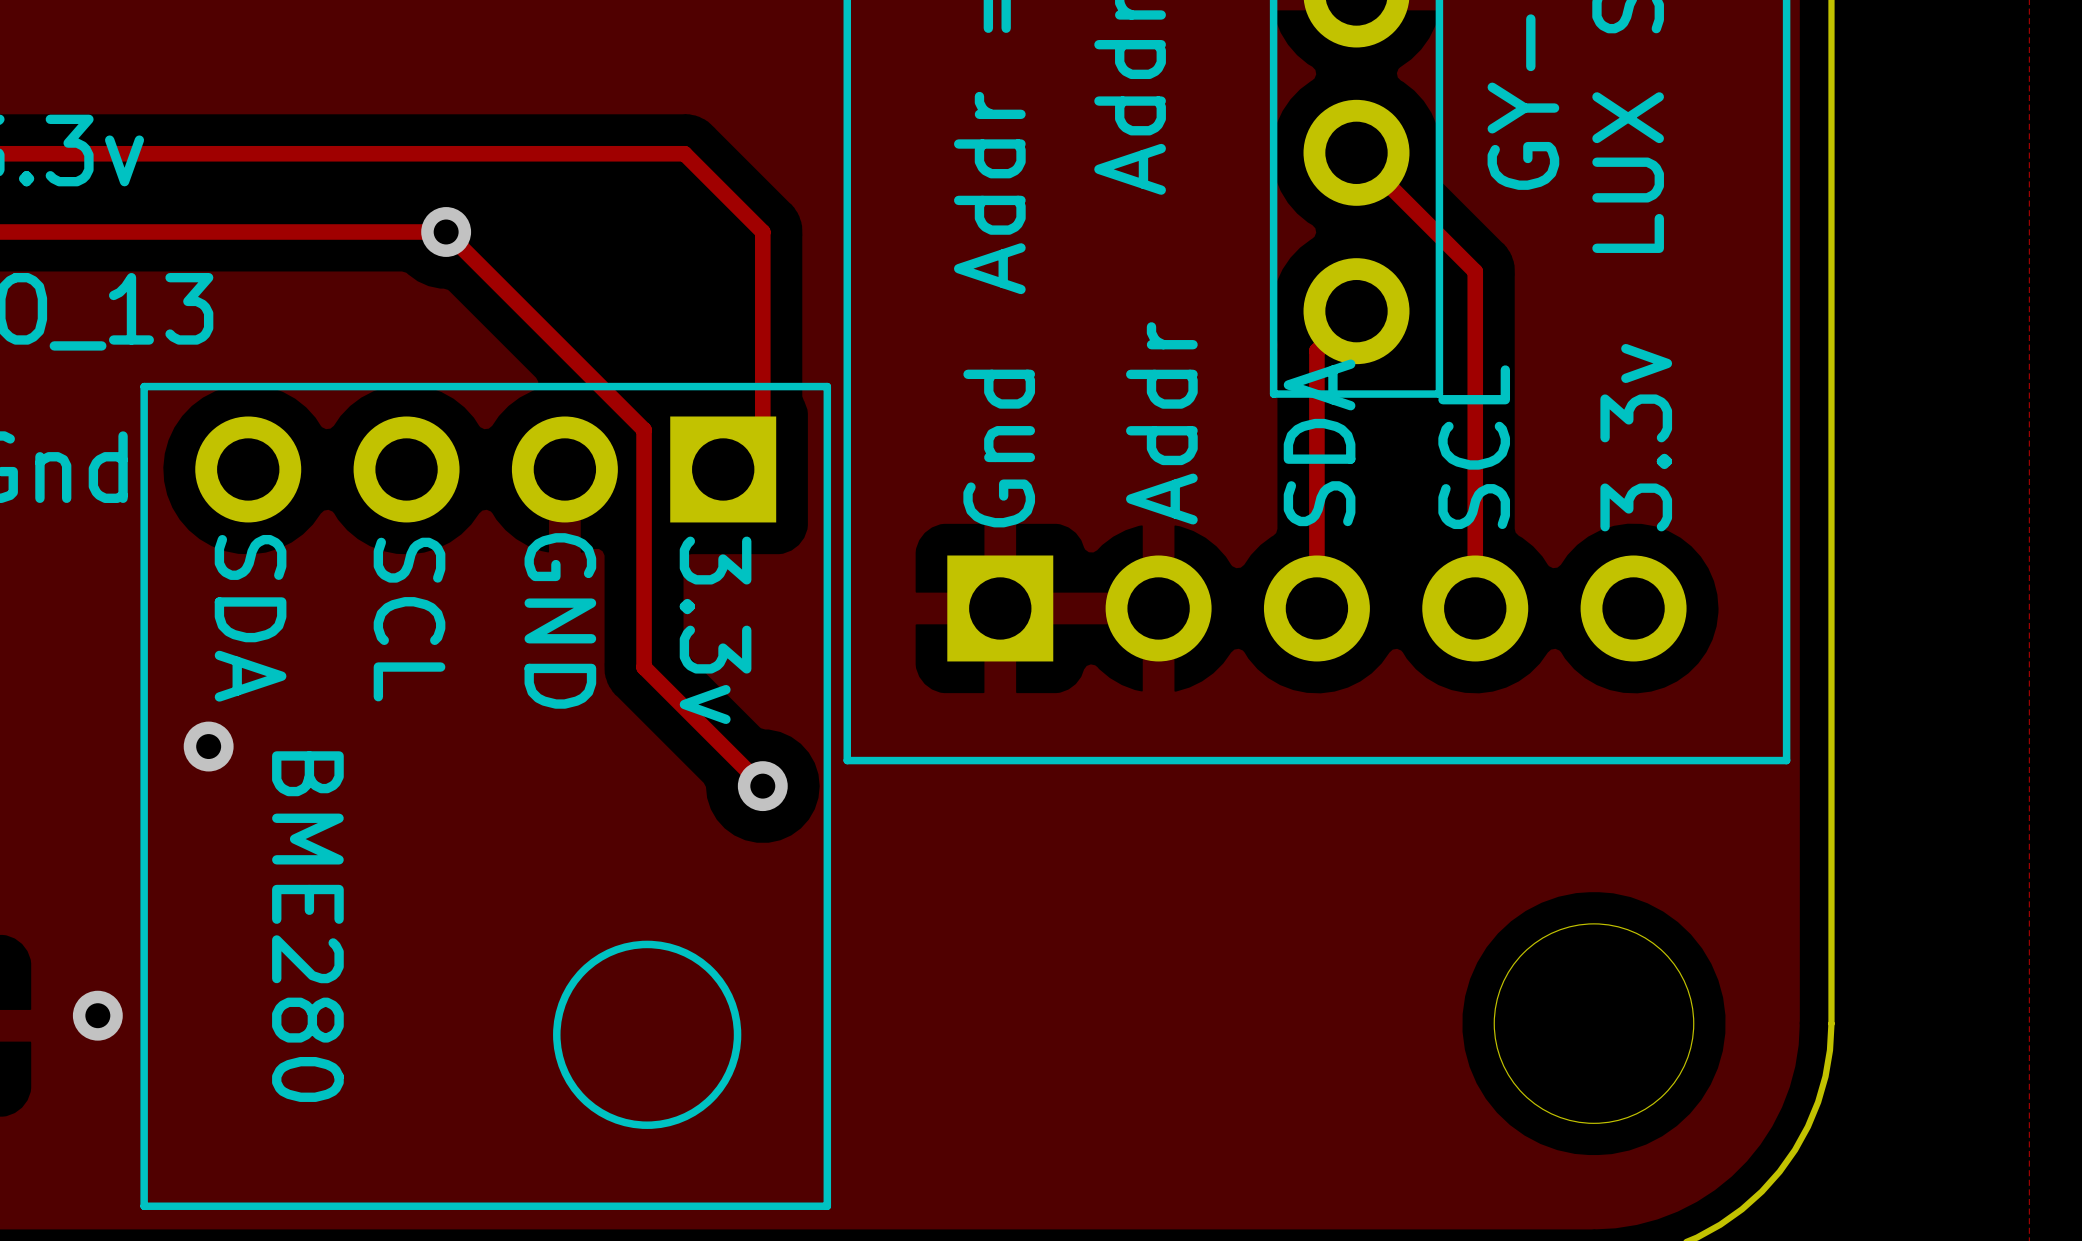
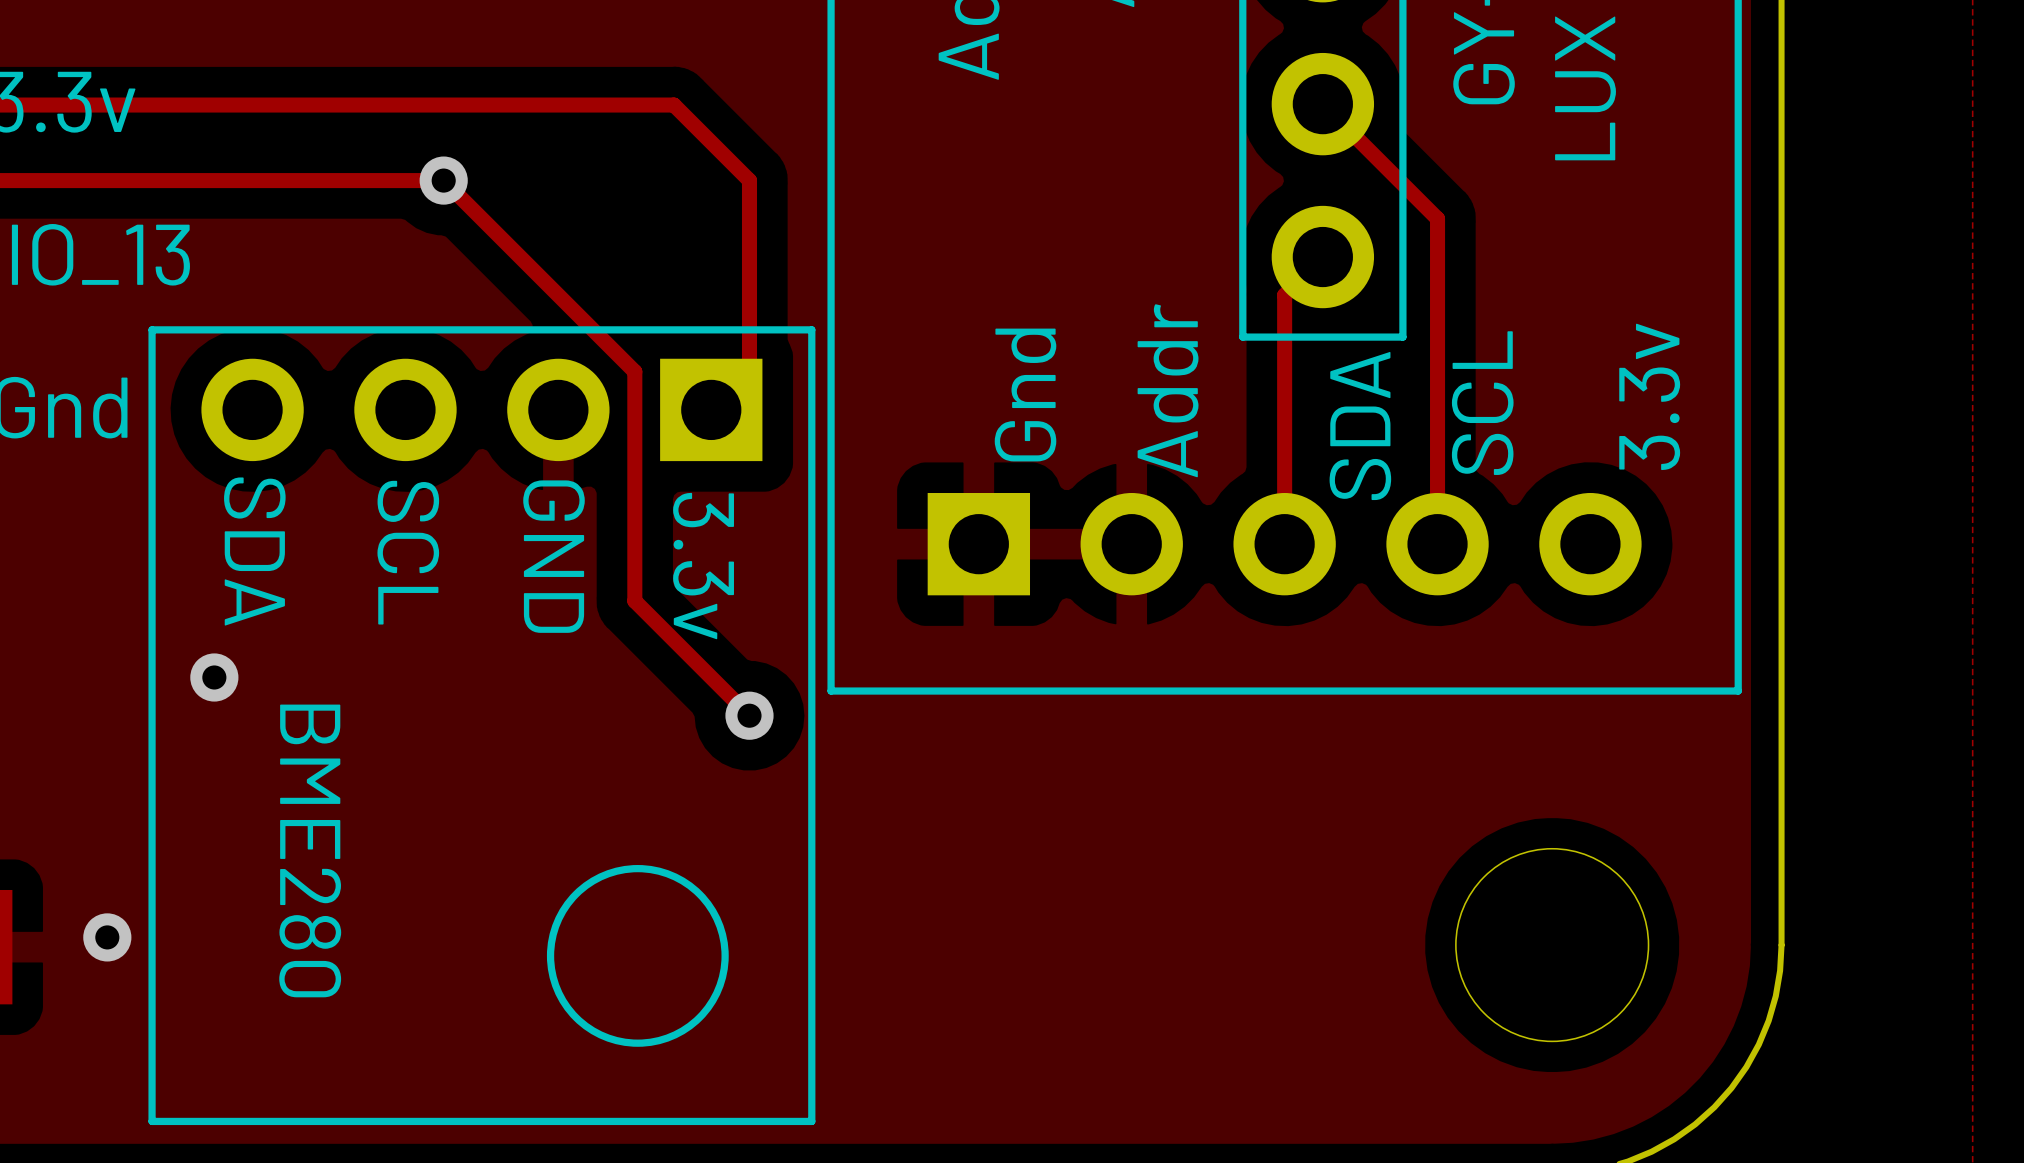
part text position: Addr (1161, 423) -> Addr (1168, 390)
part text position: 3.3v (1636, 437) -> 3.3v (1649, 396)
part text position: SDA (1319, 442) -> SDA (1360, 426)
part text position: SCL (1474, 447) -> SCL (1482, 403)
part text position: Gnd (999, 448) -> Gnd (1025, 395)

